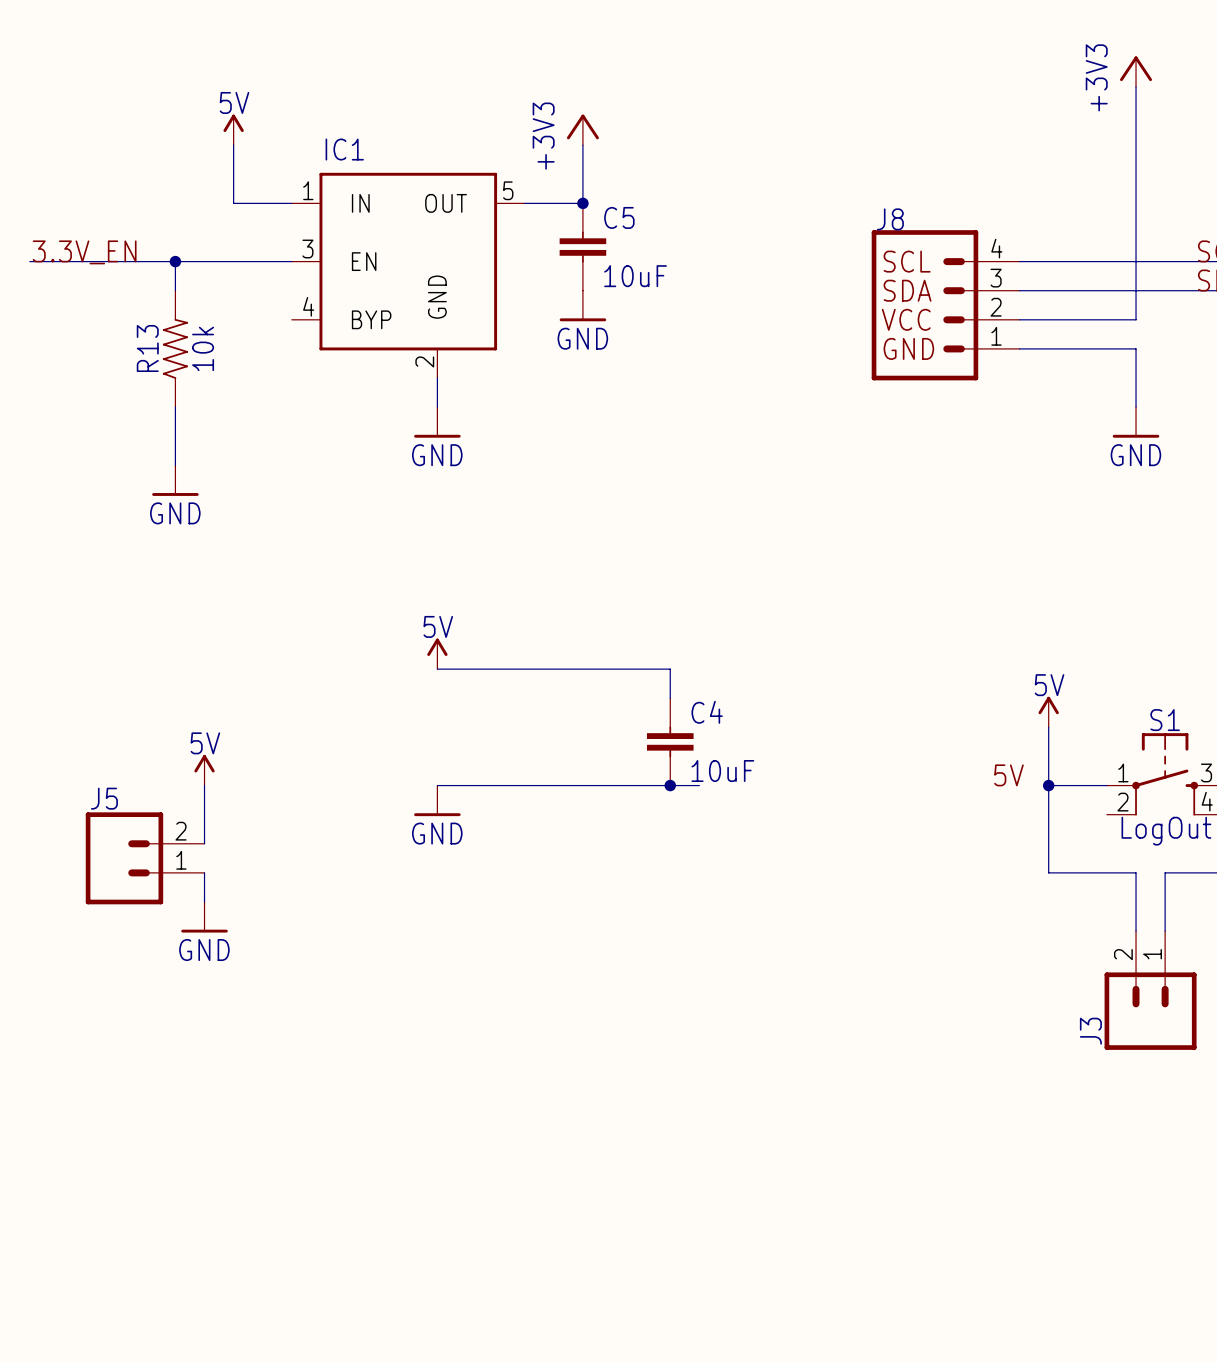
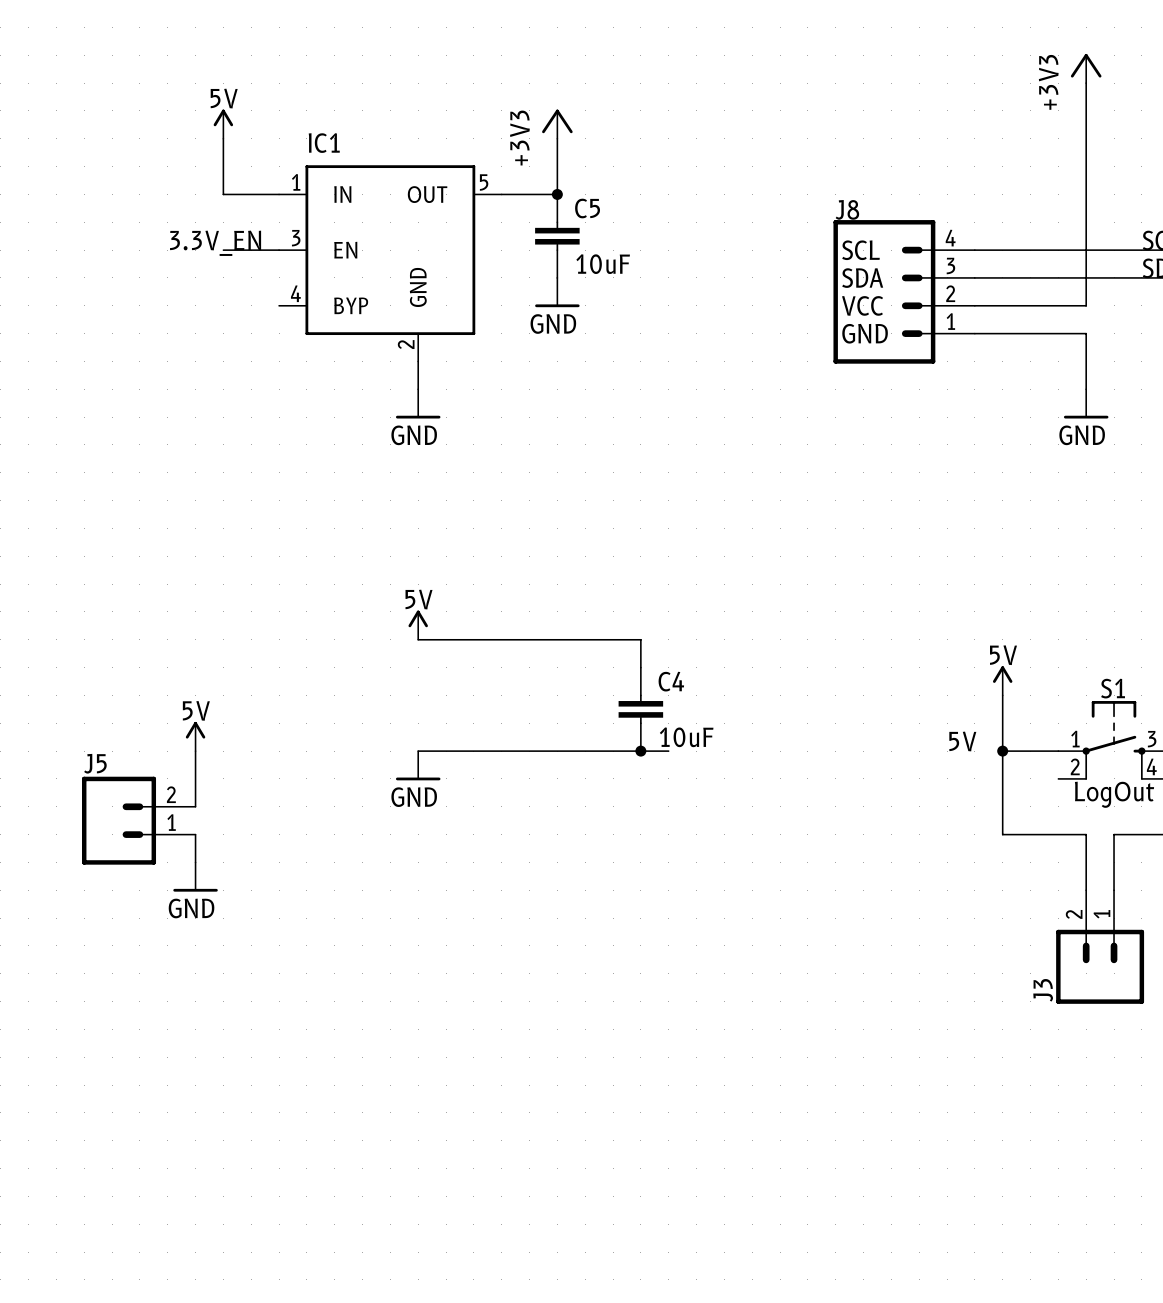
label position: 3.3V_EN (84, 252) -> 3.3V_EN (215, 243)
wire: (29, 261) (233, 261) -> none
wire: (175, 261) (175, 290) -> none
junction: (175, 261) -> none
R13: 10k (175, 348) -> none
wire: (175, 407) (175, 465) -> none
power symbol: GND (175, 480) -> none

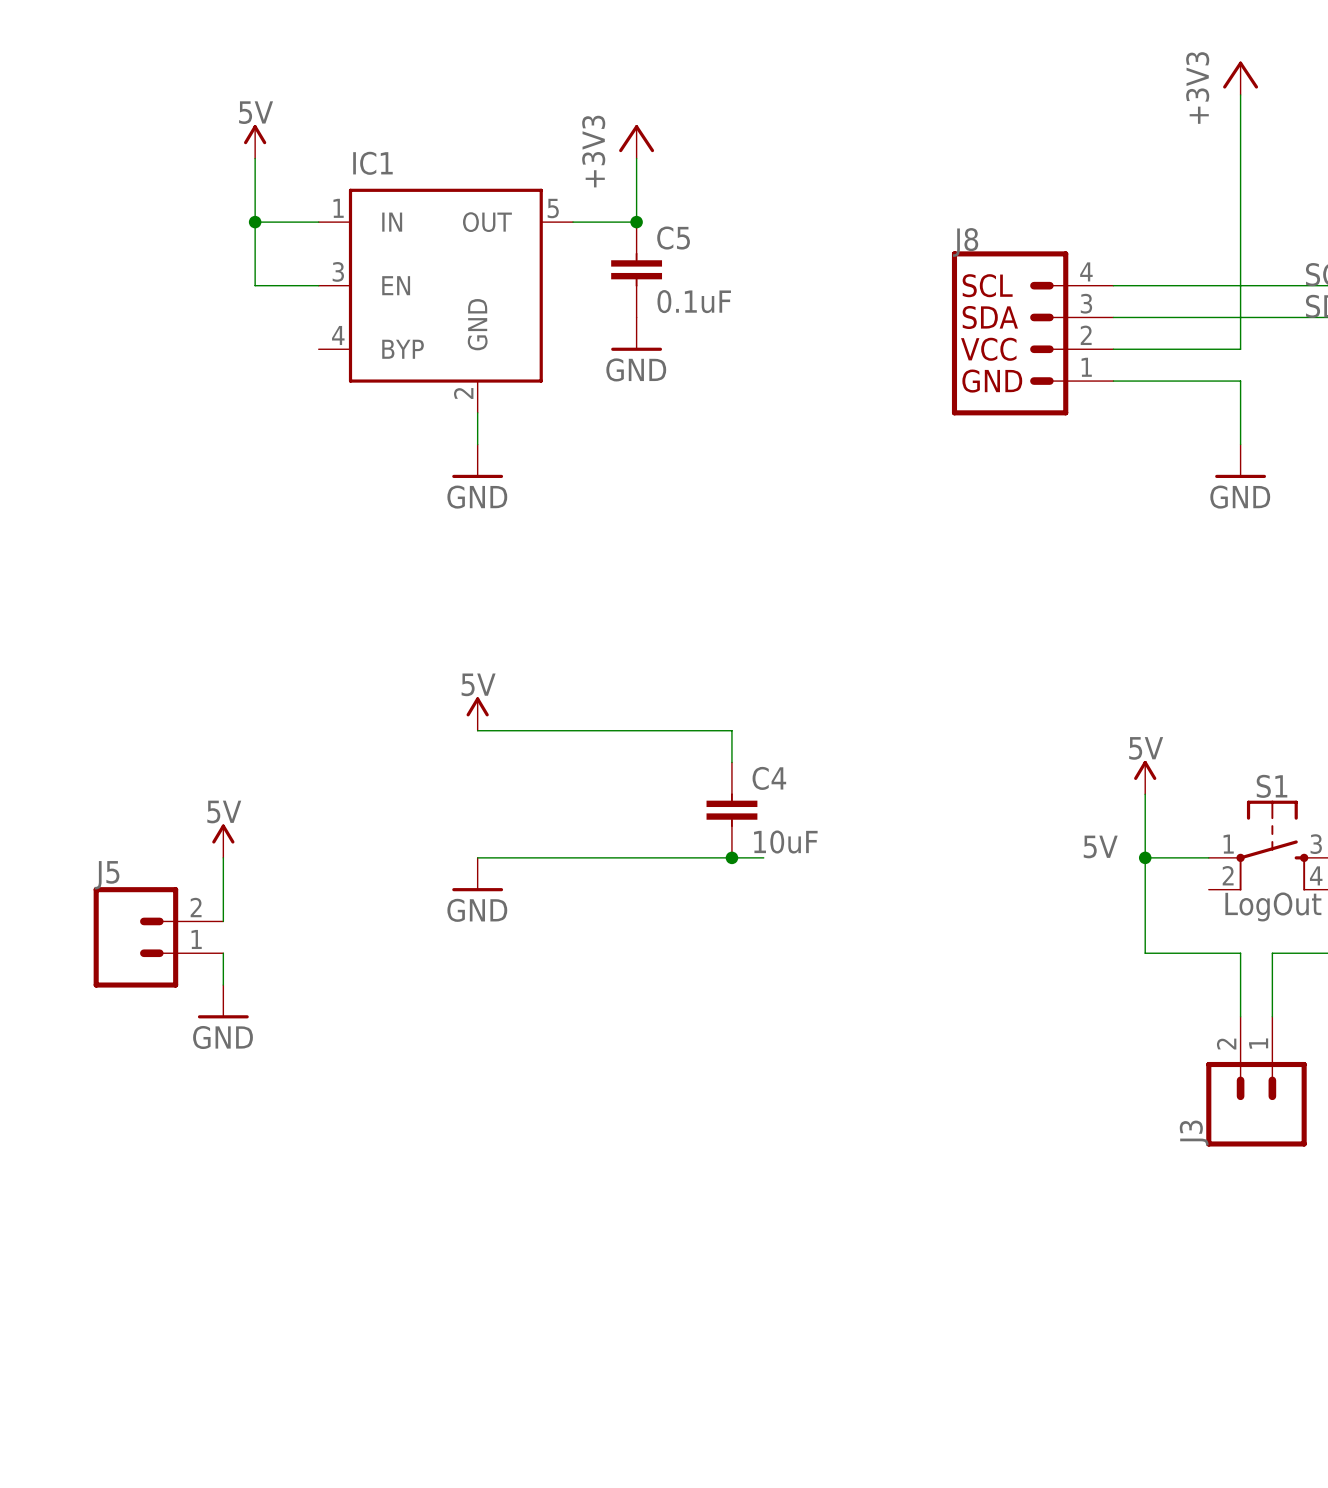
wire: none -> (255, 222) (255, 285)
junction: none -> (255, 222)
label: 3.3V_EN (215, 243) -> none
C5 value: 10uF (603, 264) -> 0.1uF (694, 301)

